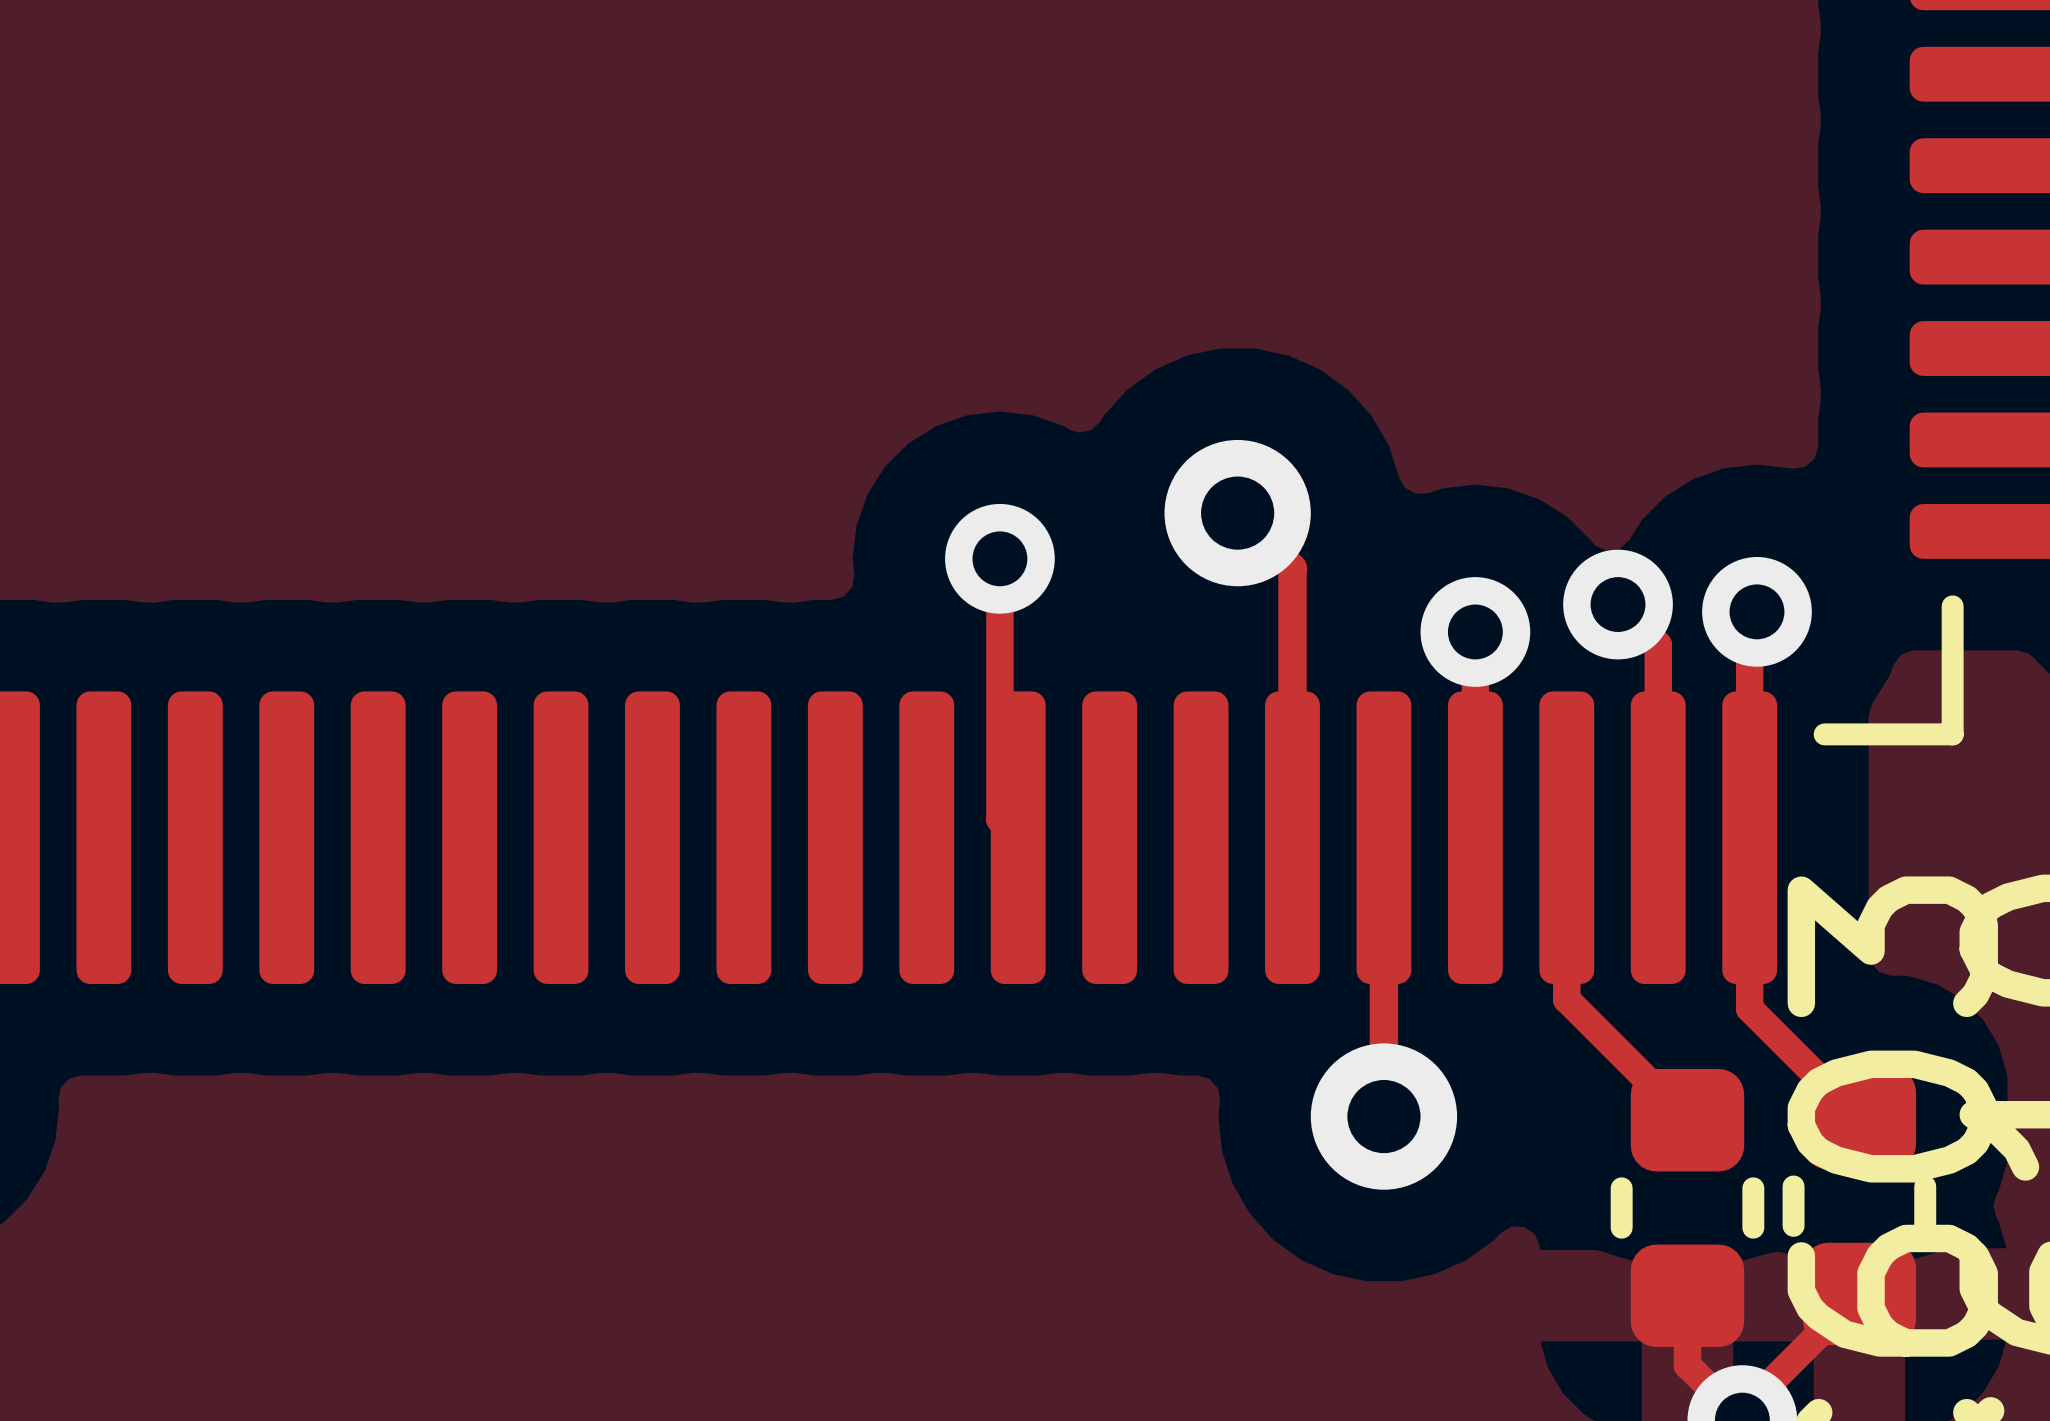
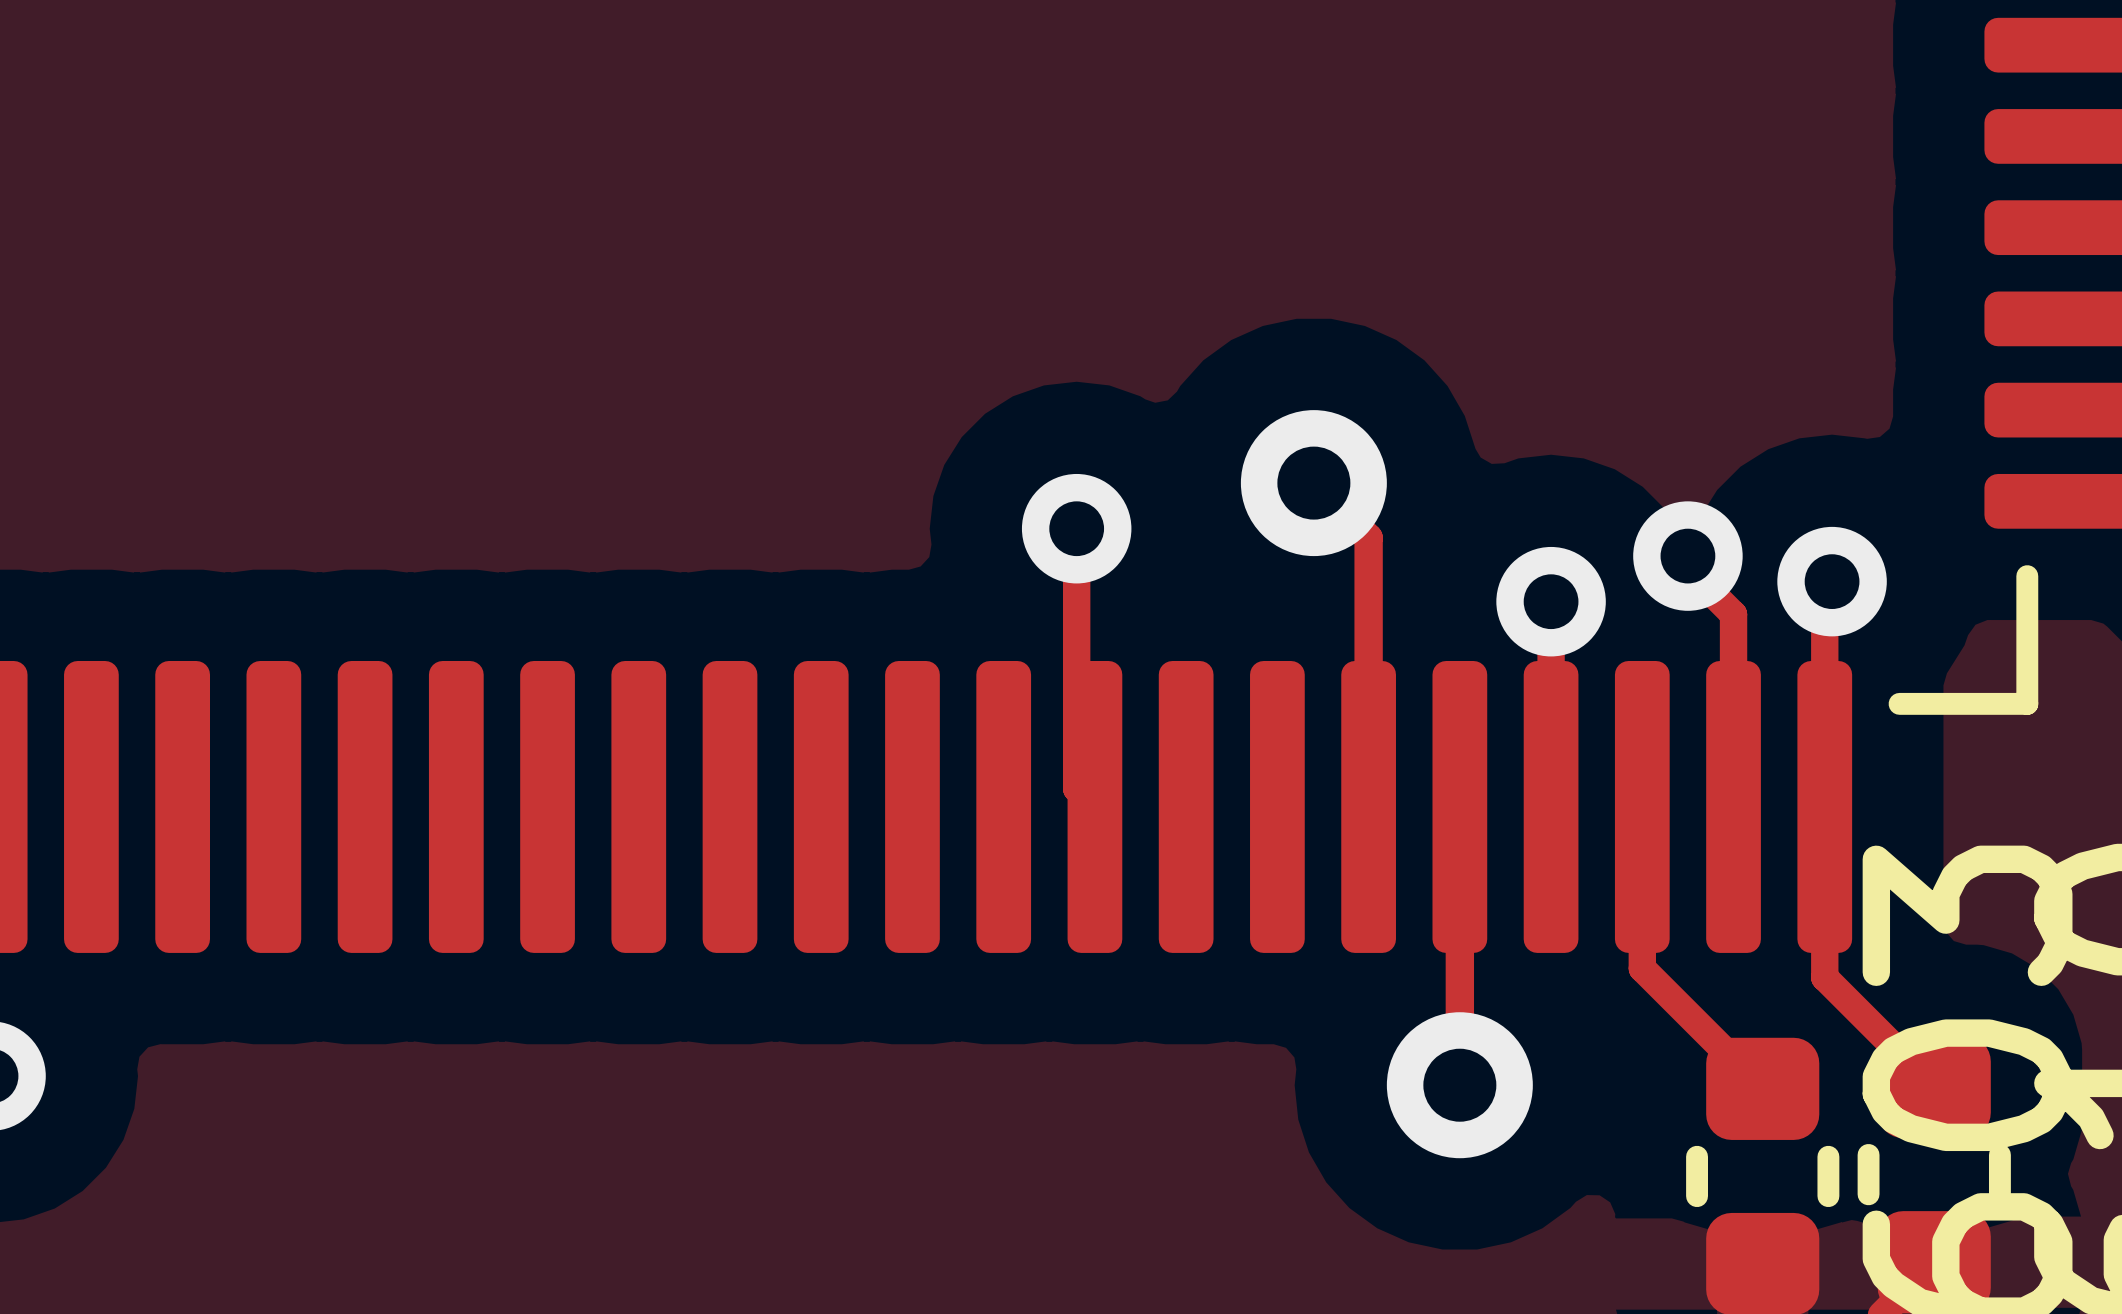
via position: (1618, 604) -> (1687, 556)

